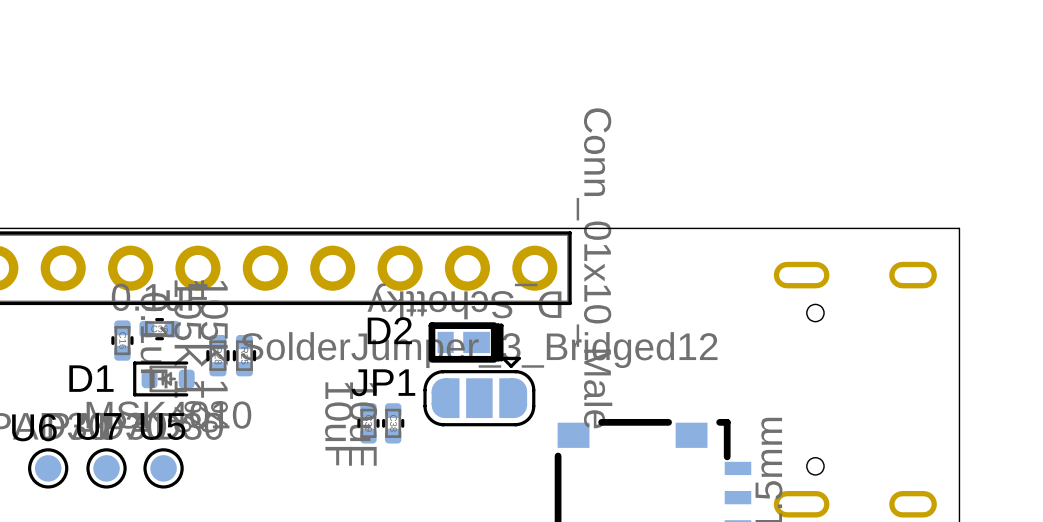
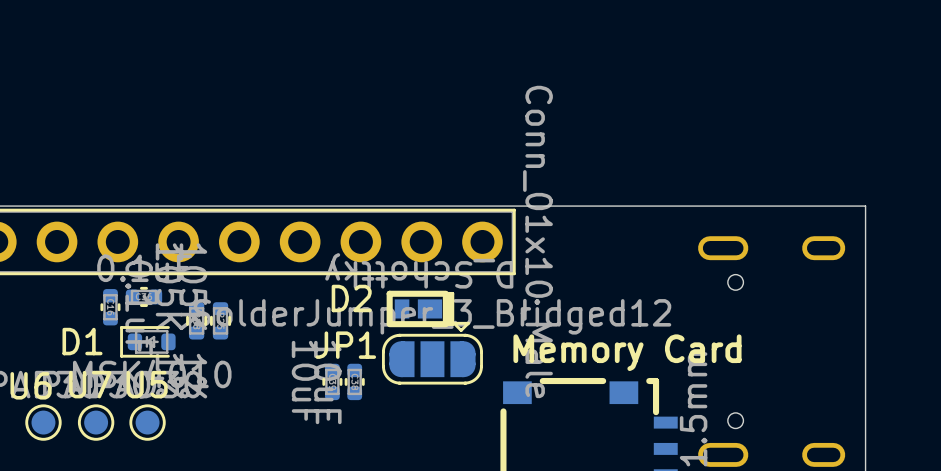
text: none -> Memory Card (627, 352)

